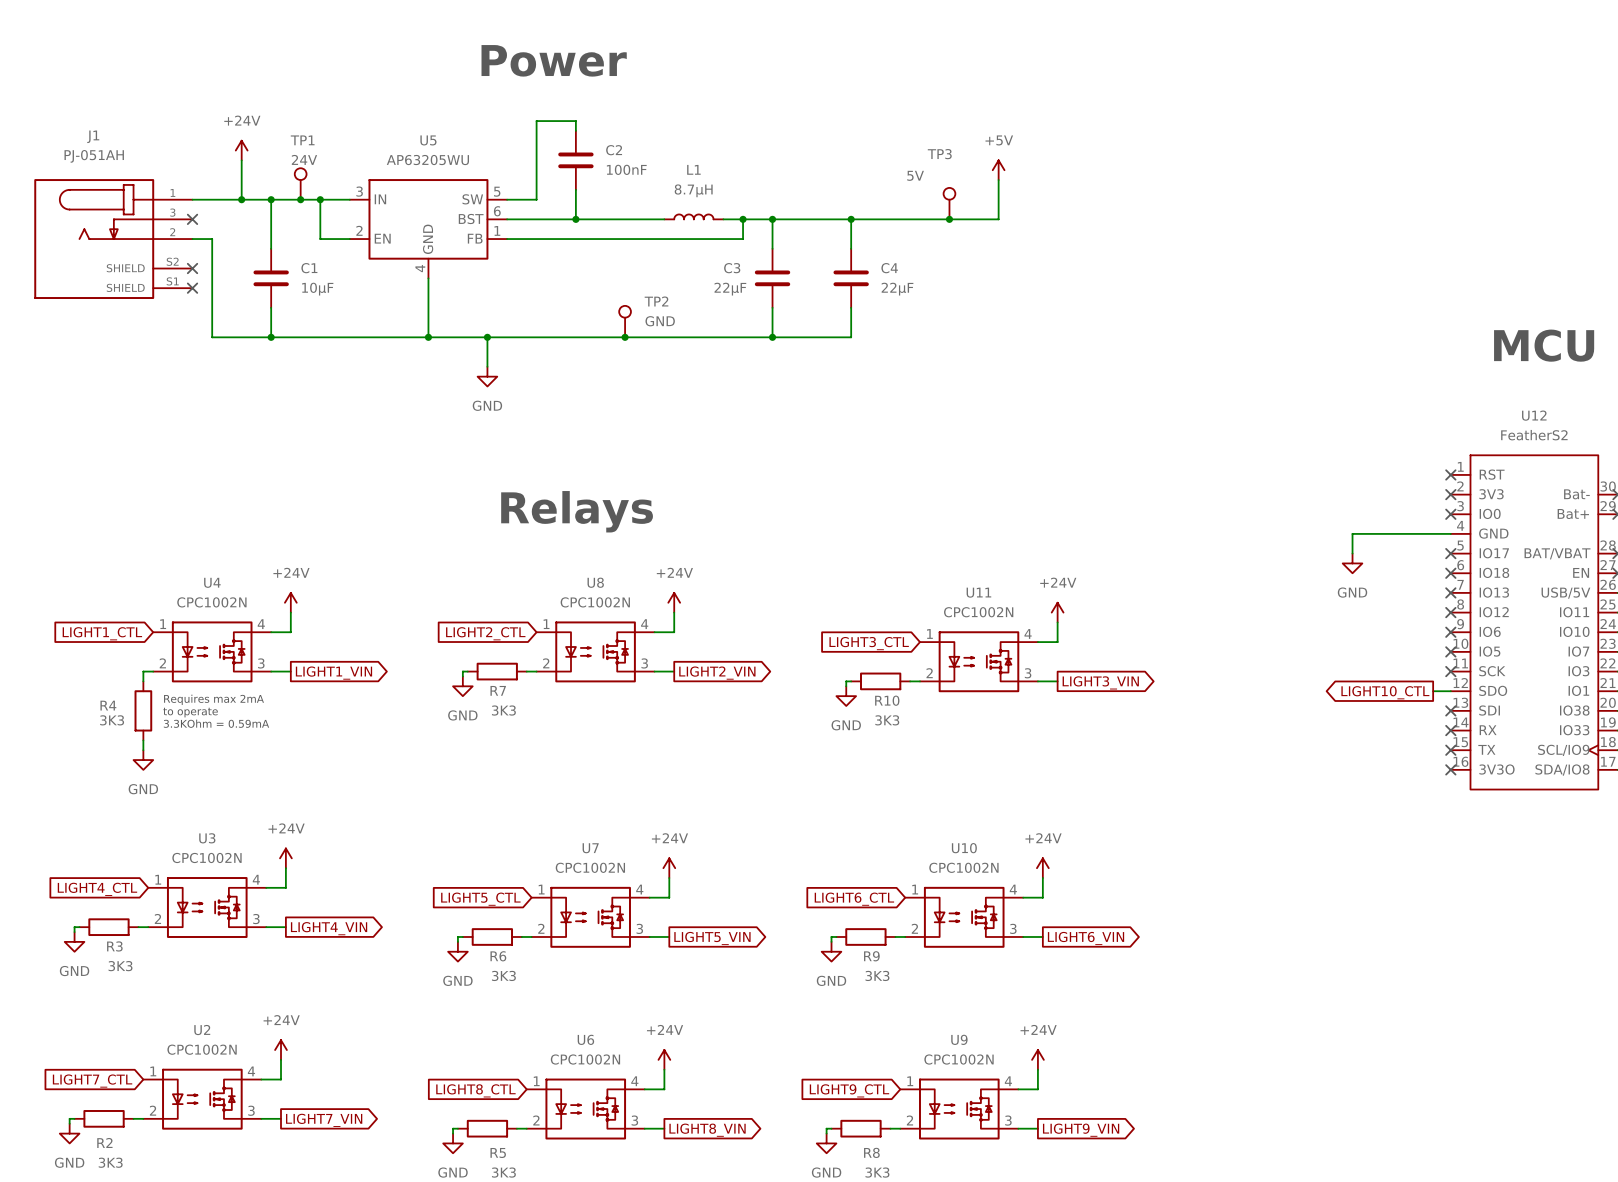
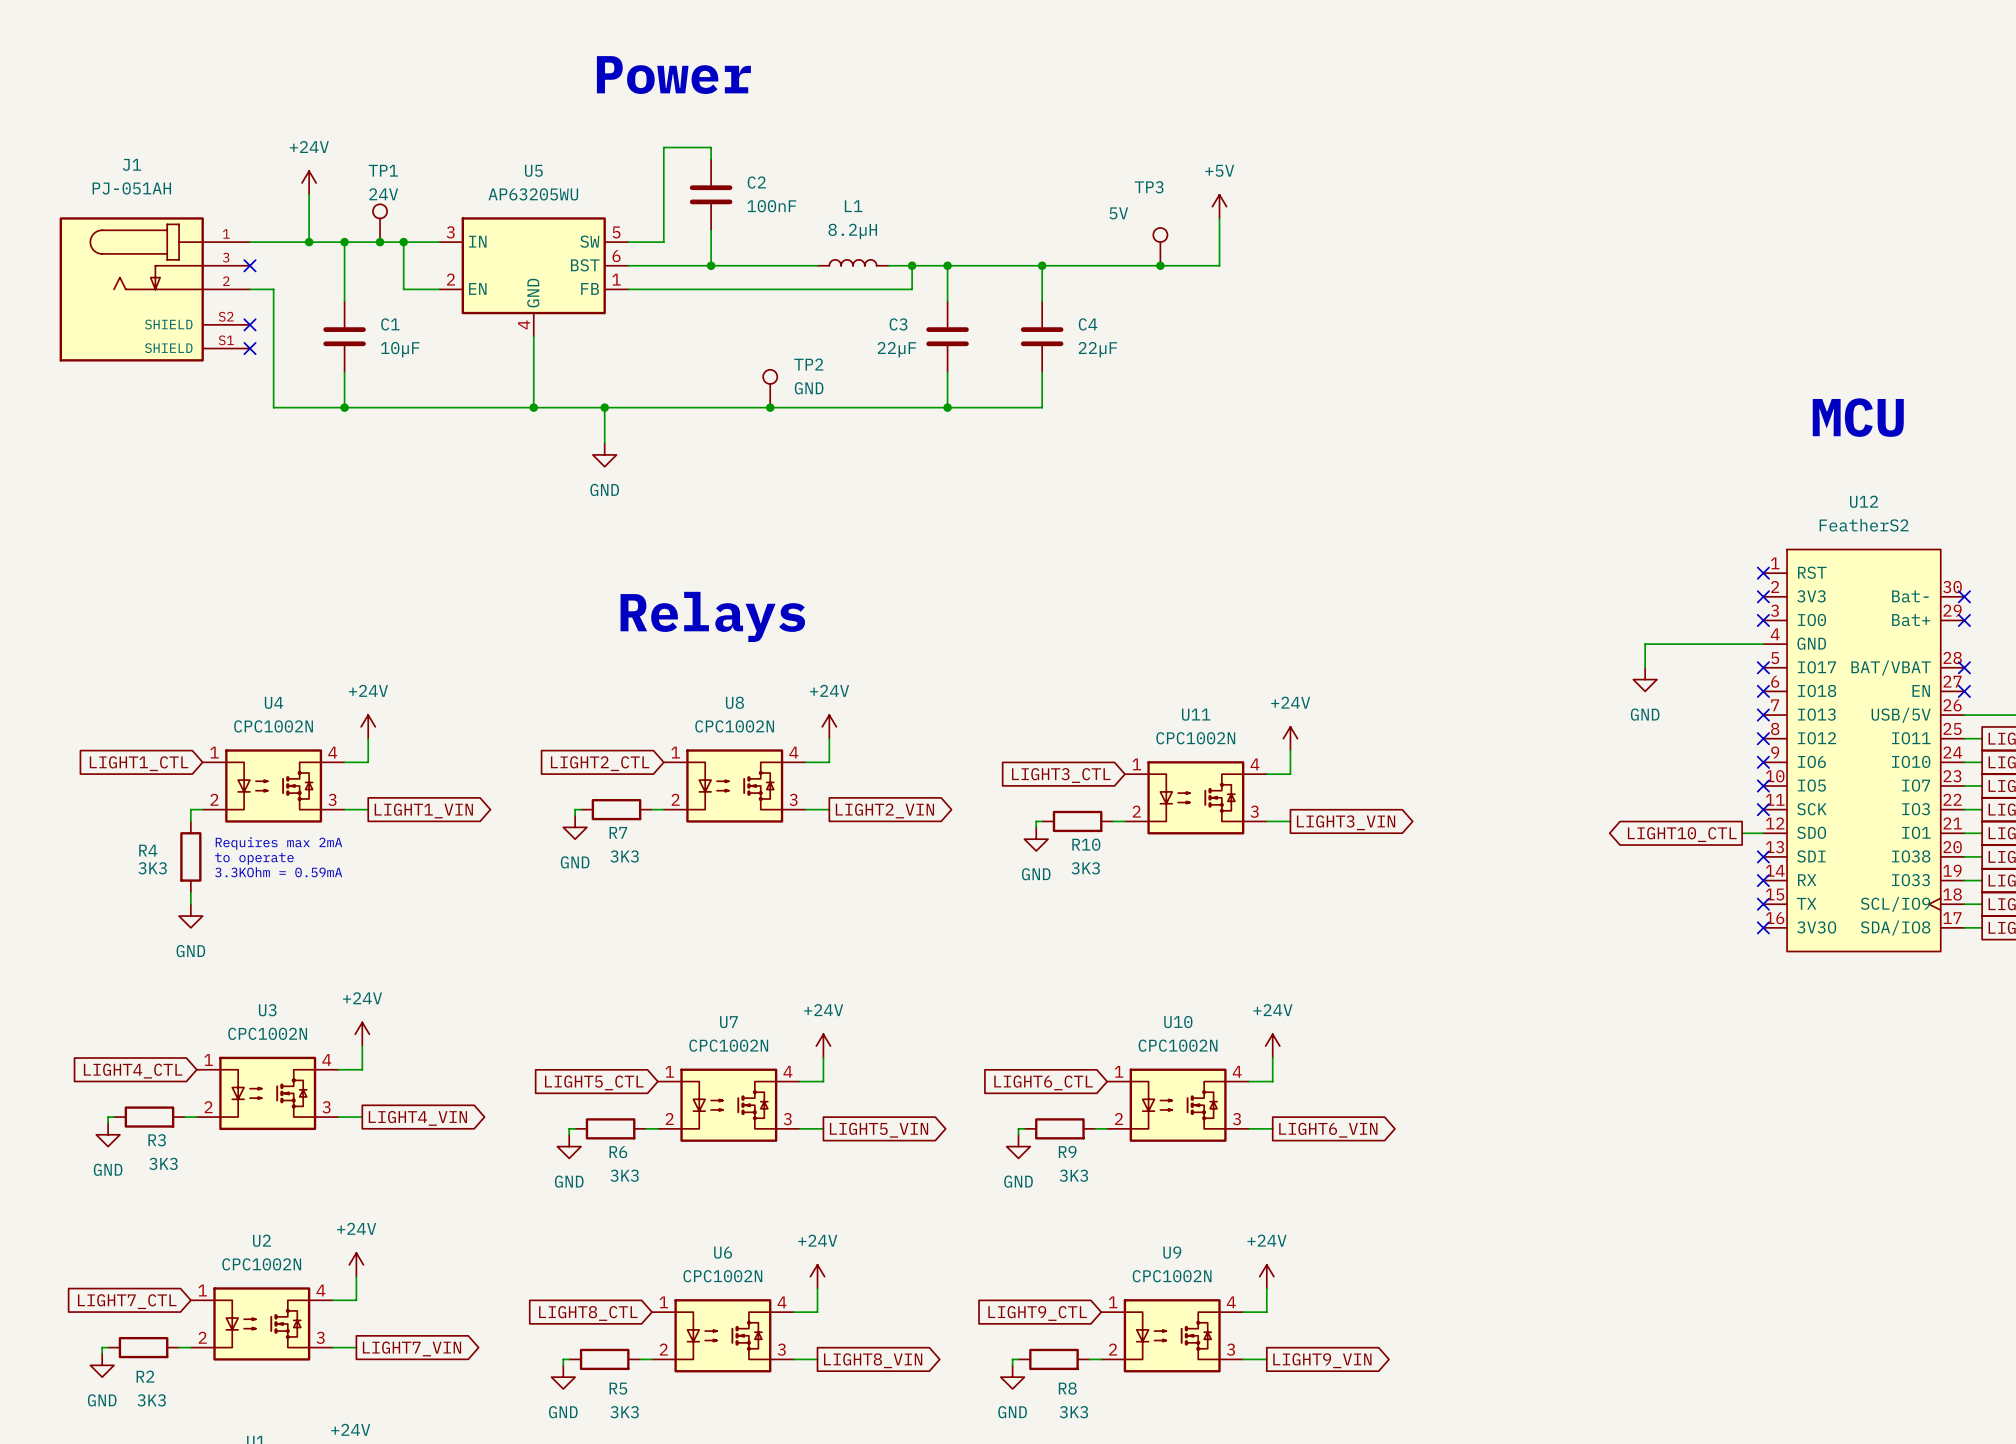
L1 value: 8.7µH (693, 190) -> 8.2µH (852, 231)

